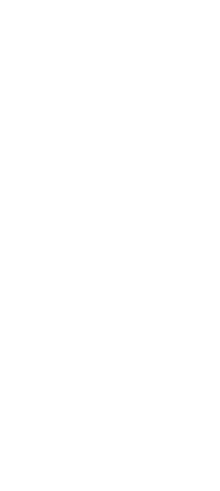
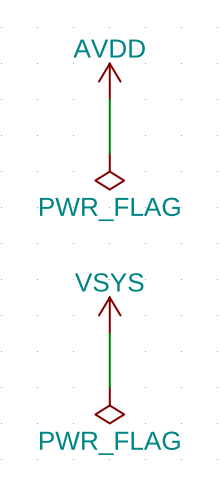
power symbol: none -> AVDD (109, 81)
wire: none -> (109, 99) (109, 153)
power symbol: none -> PWR_FLAG (109, 171)
power symbol: none -> VSYS (109, 315)
wire: none -> (109, 333) (109, 387)
power symbol: none -> PWR_FLAG (109, 405)

